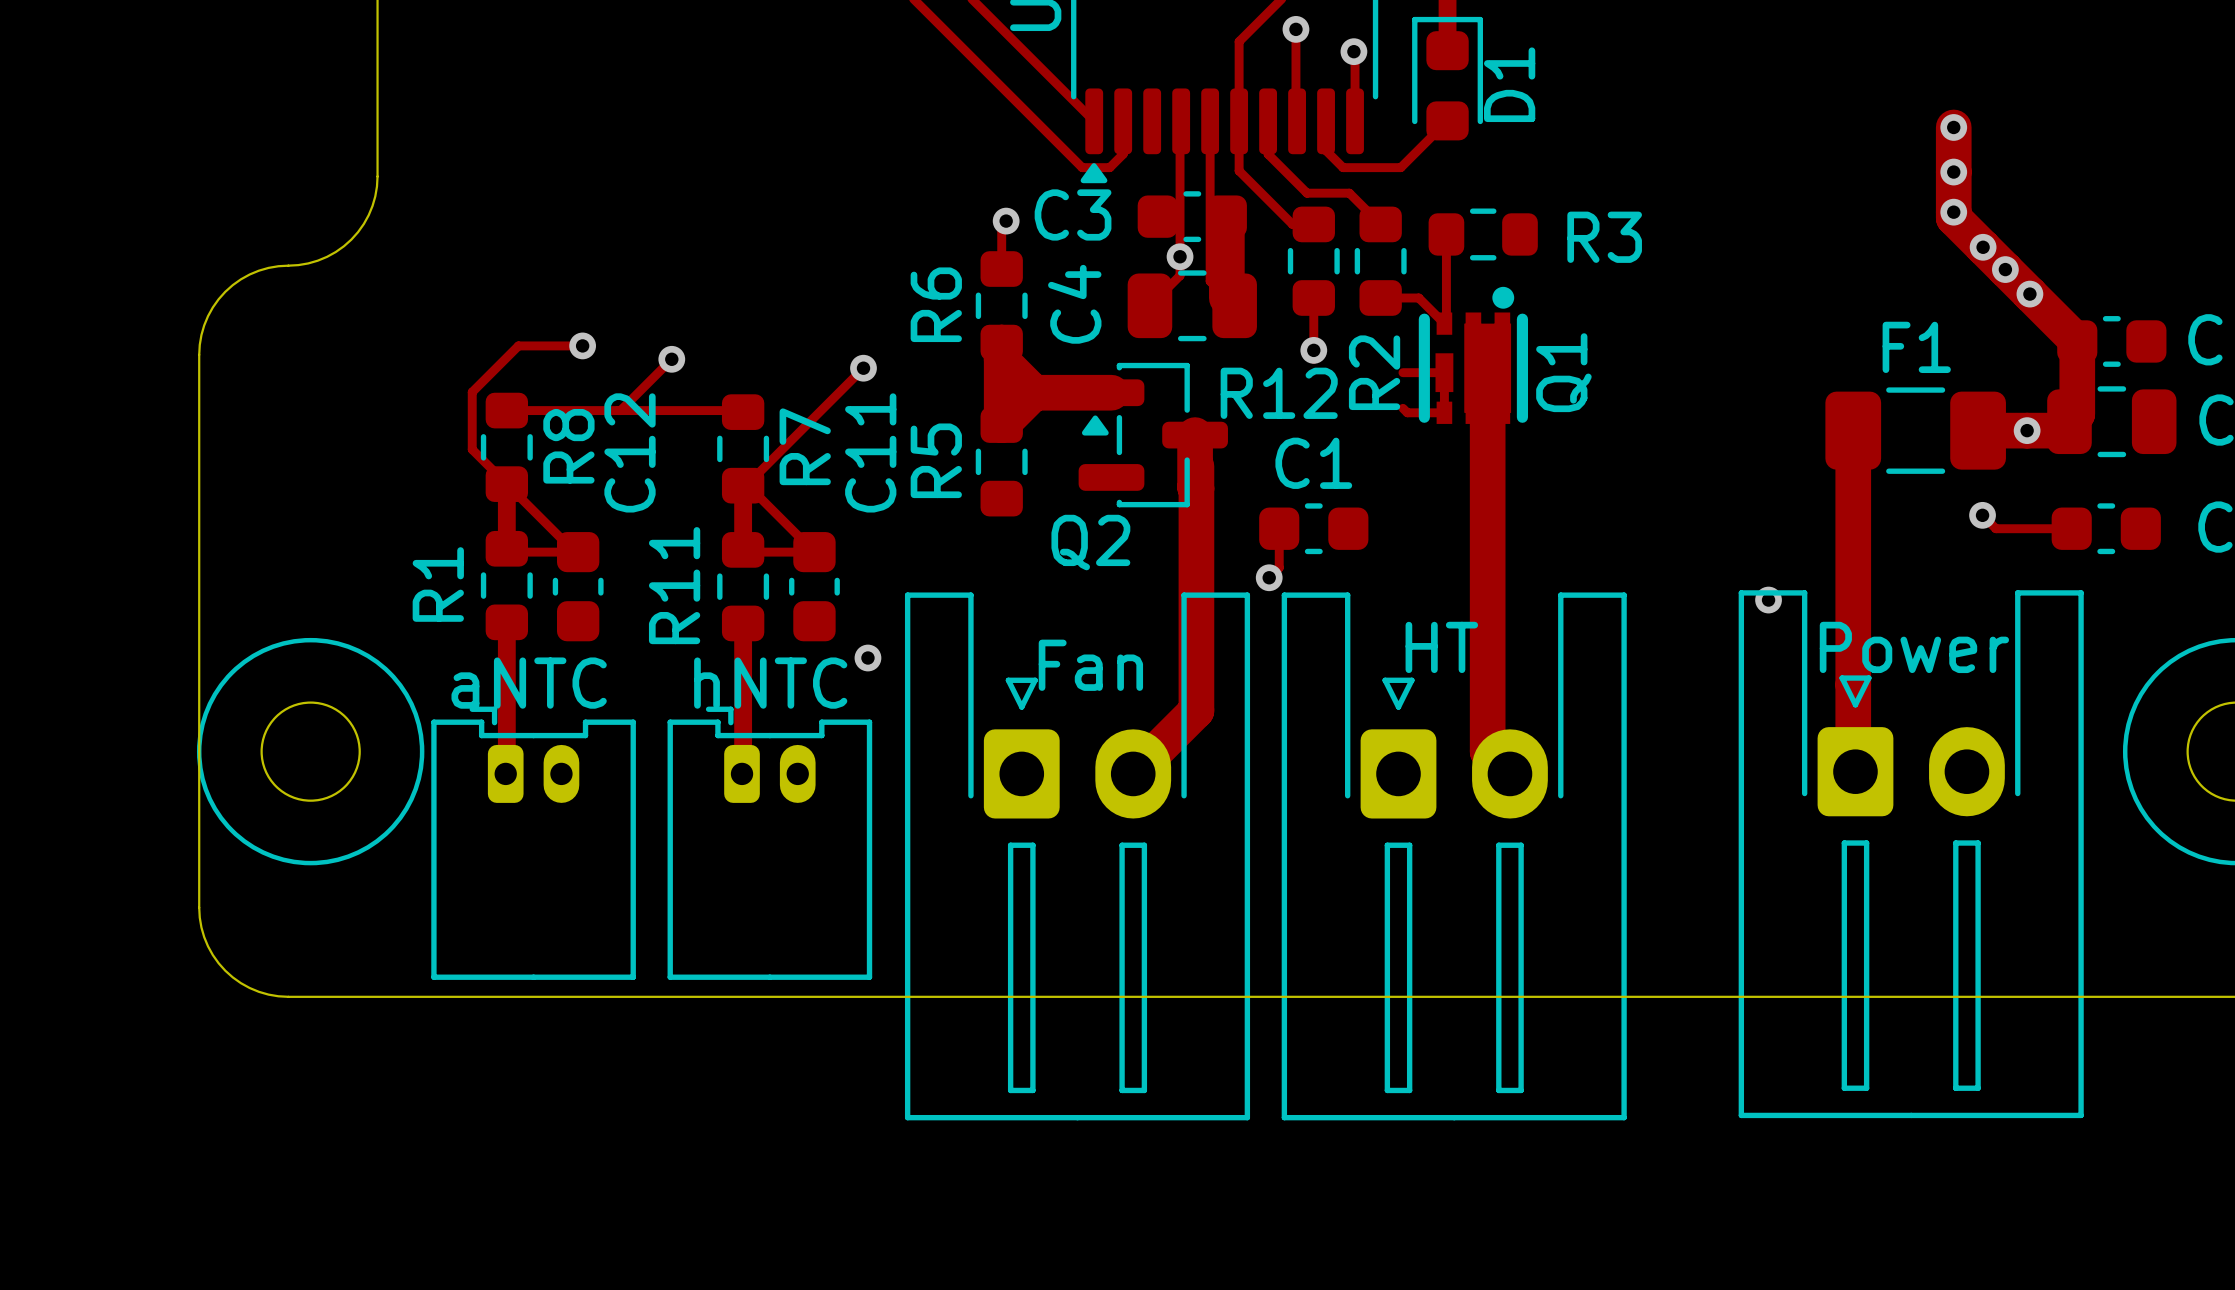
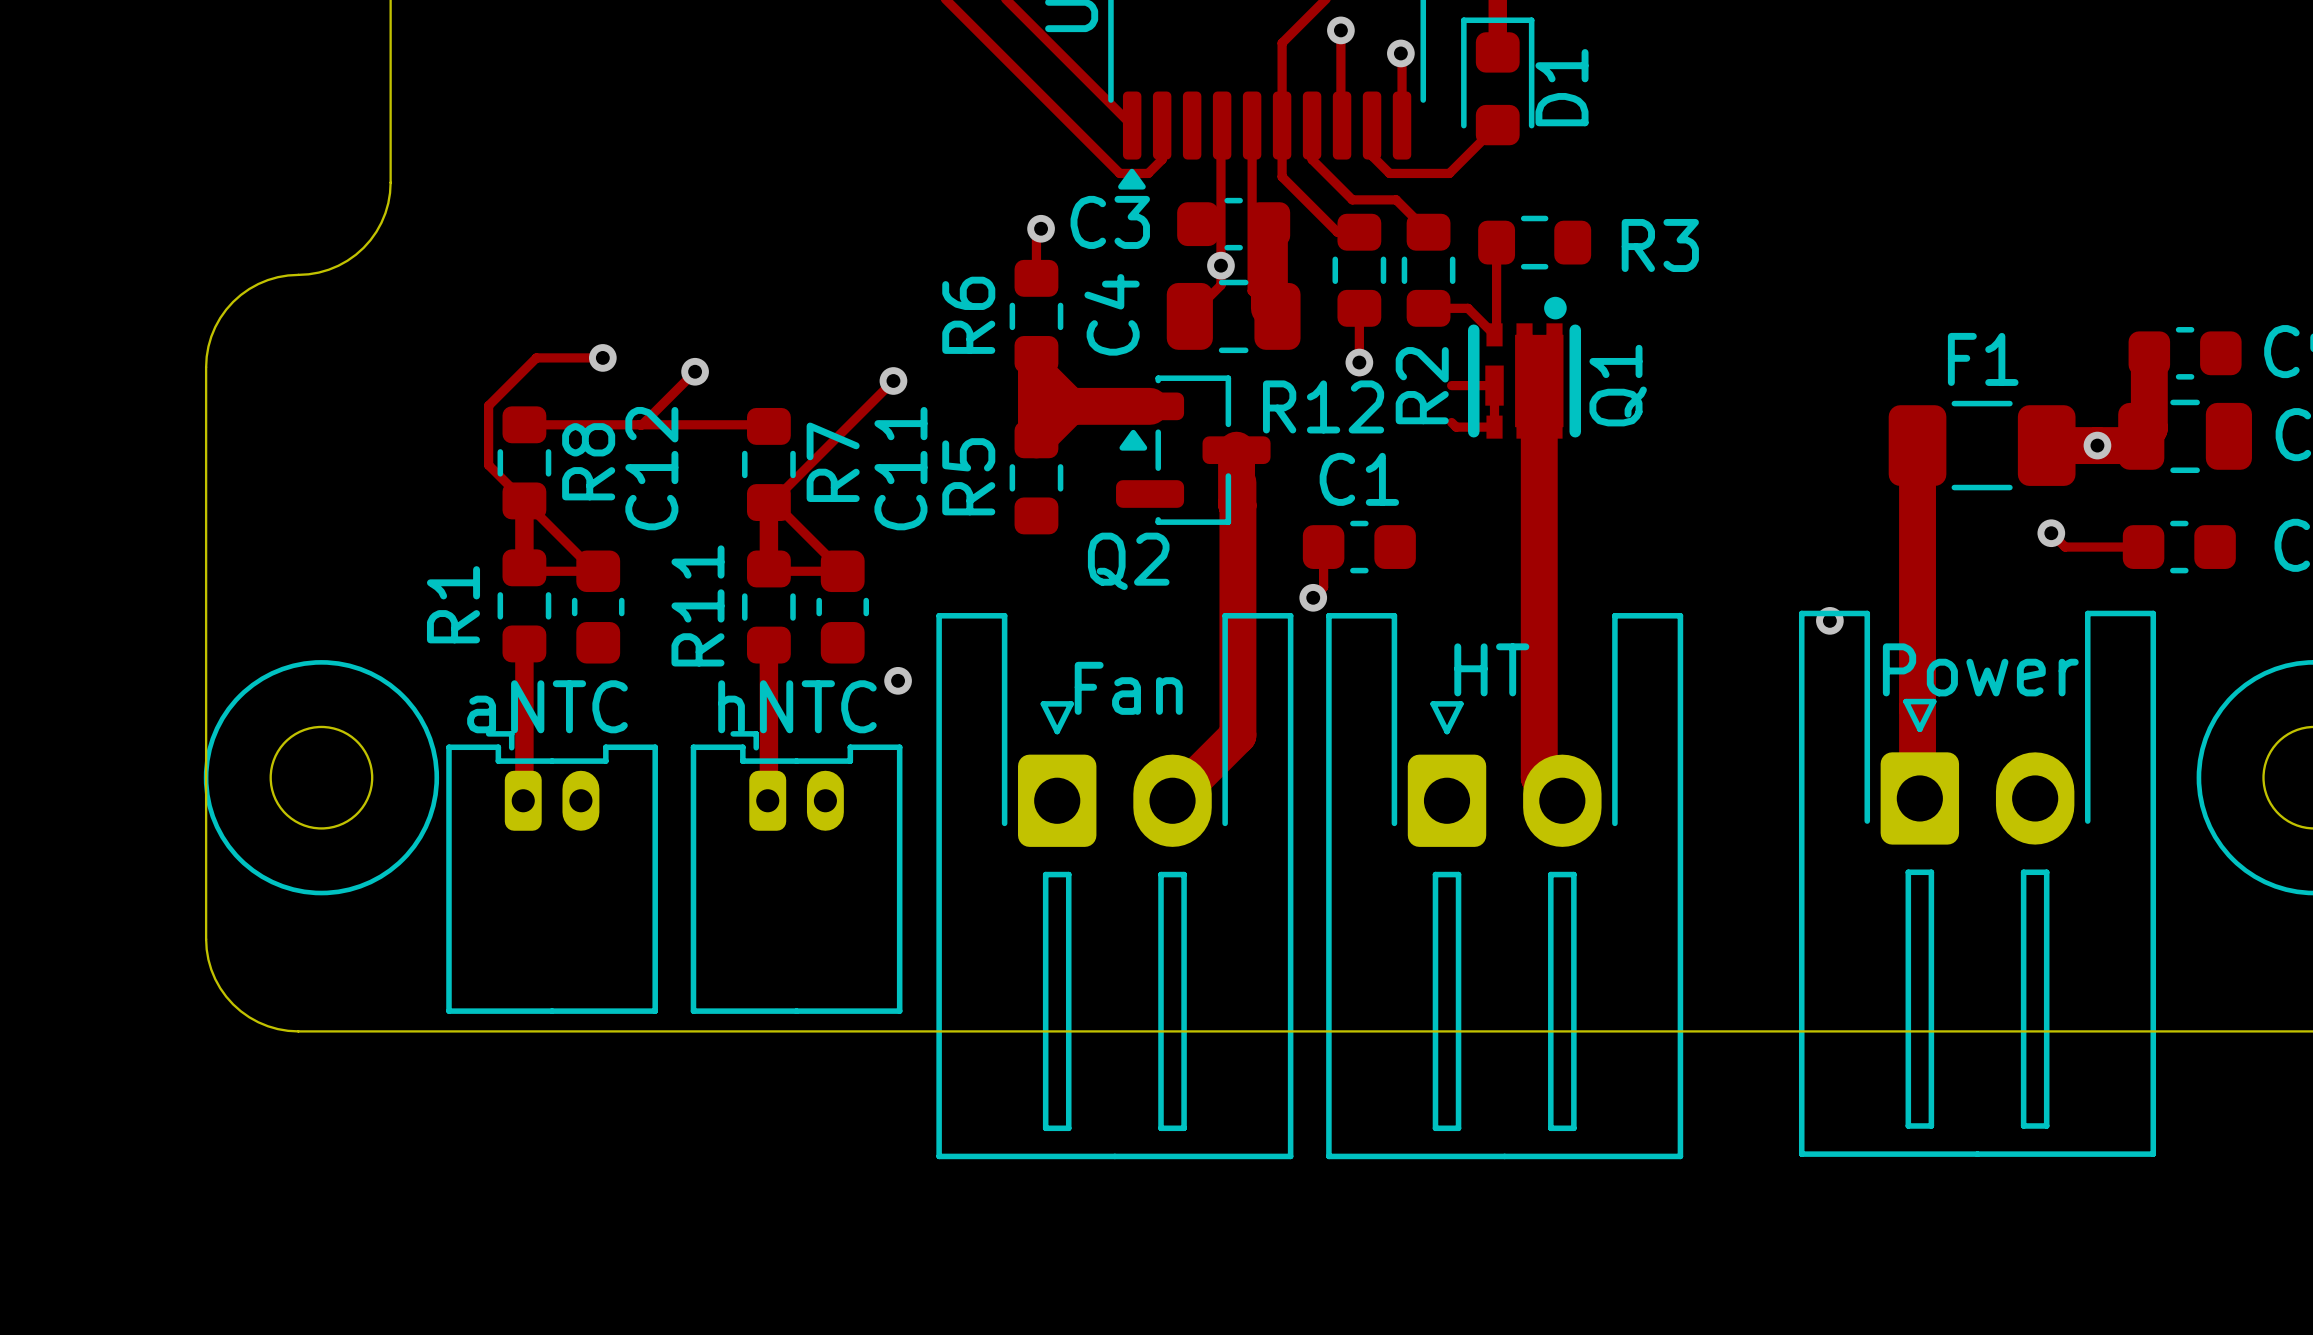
track: (1953, 127) (1953, 217) (2077, 341) -> none
via: (1953, 127) -> none
via: (1953, 172) -> none
via: (1953, 212) -> none
via: (1983, 247) -> none
via: (2005, 269) -> none
via: (2029, 294) -> none

